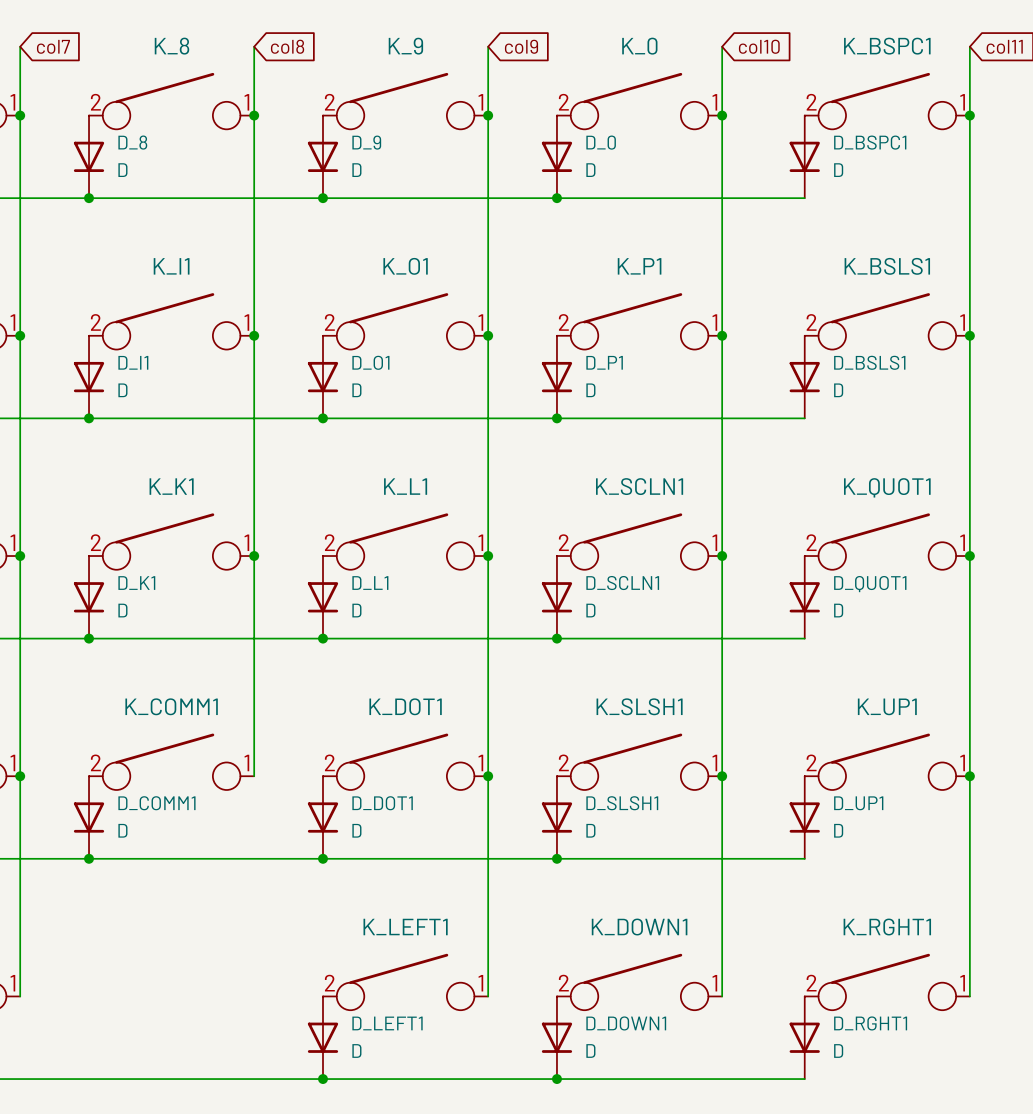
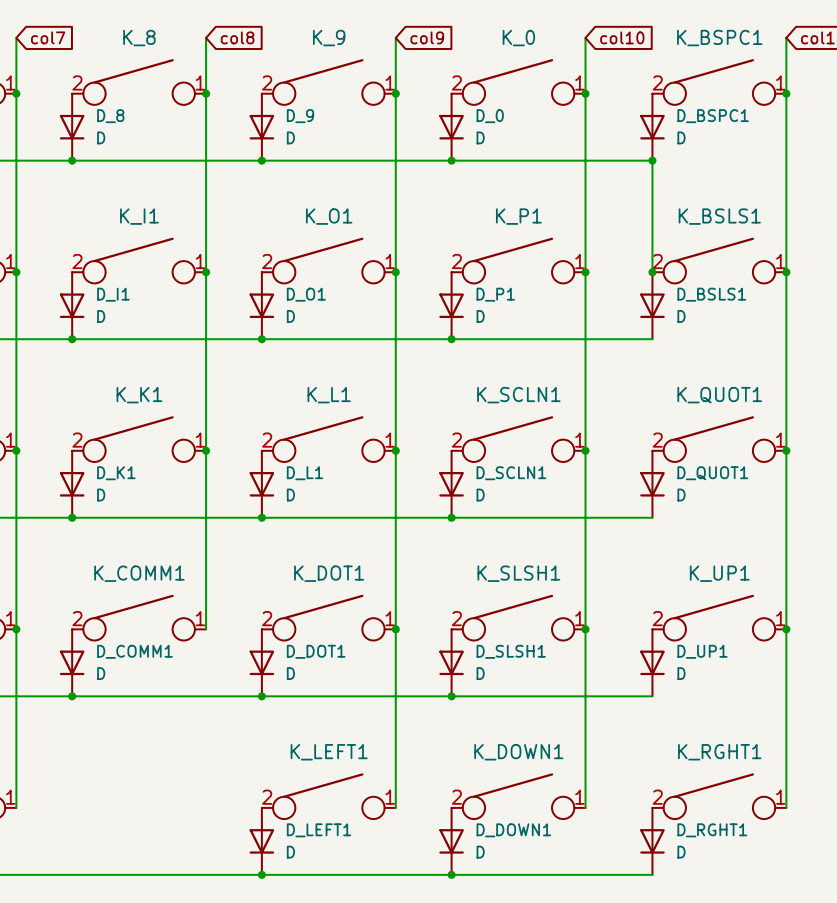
wire: none -> (652, 160) (652, 272)
junction: none -> (652, 160)
junction: none -> (652, 272)

